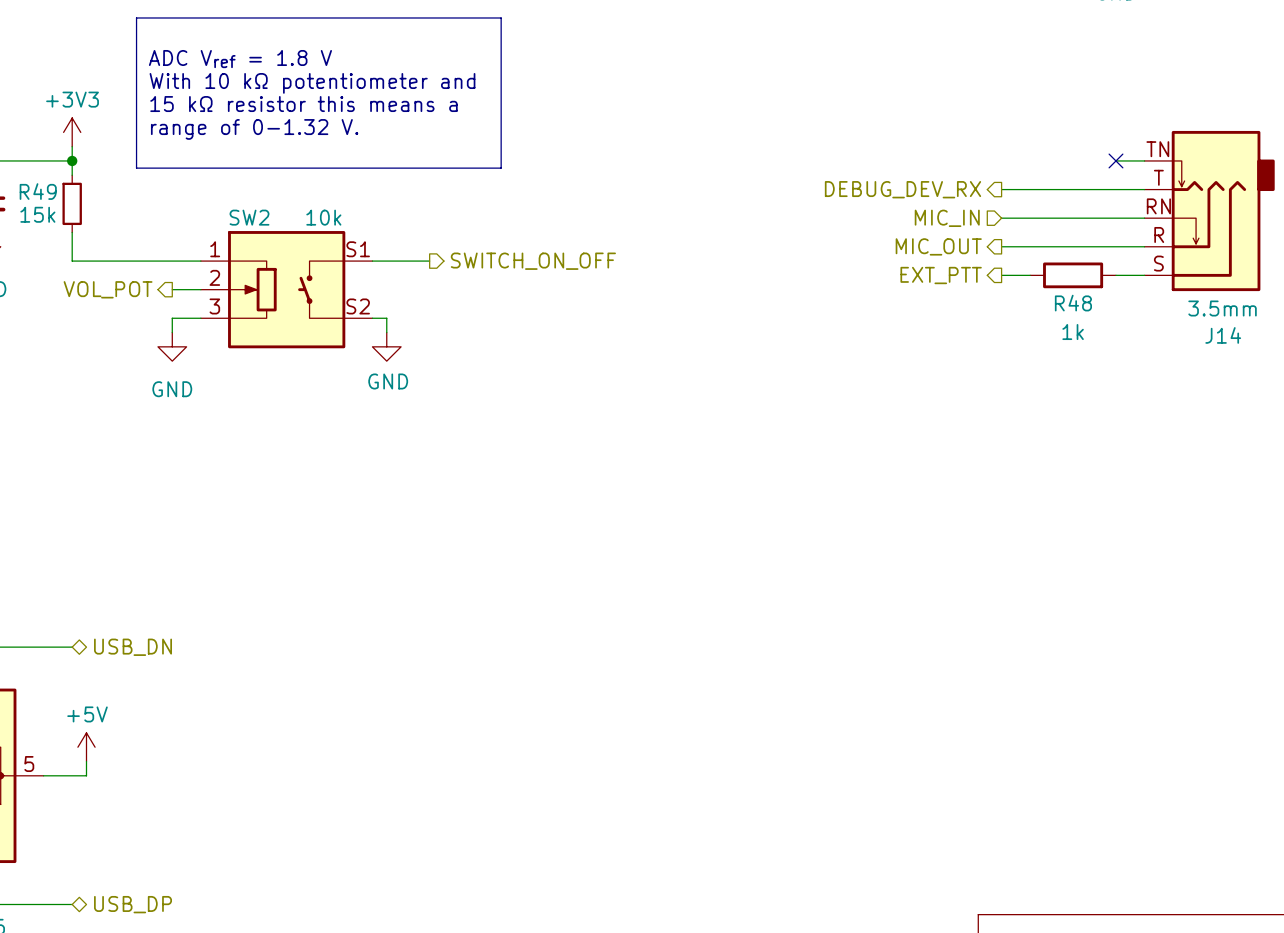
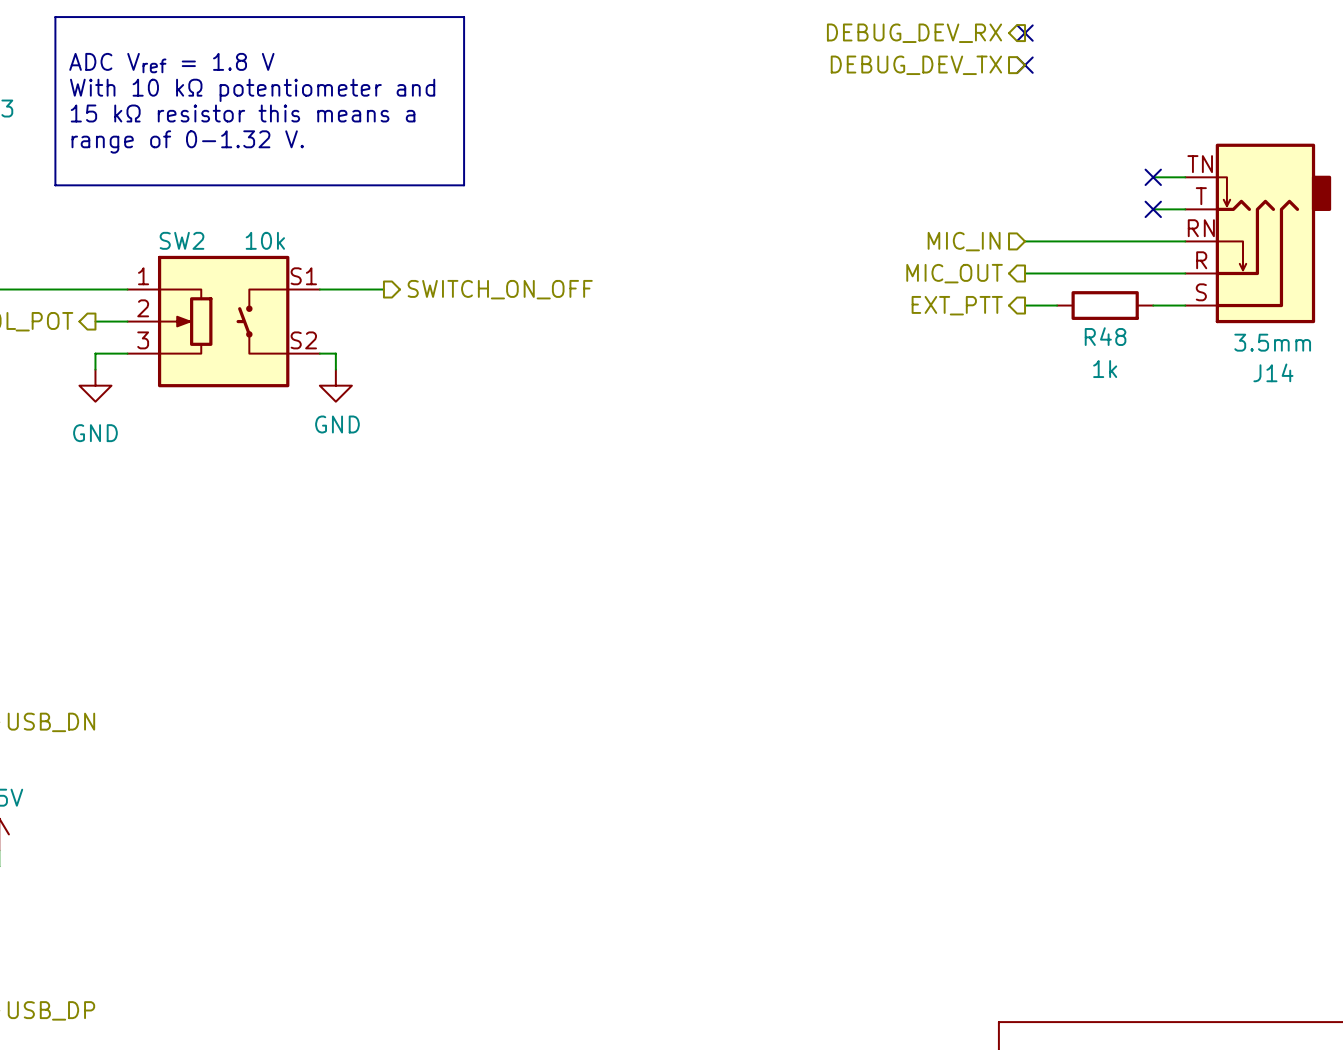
no-connect mark: none -> (1025, 33)
no-connect mark: none -> (1025, 65)
hierarchical label: none -> DEBUG_DEV_TX (916, 65)
hierarchical label position: DEBUG_DEV_RX (902, 189) -> DEBUG_DEV_RX (914, 33)
wire: (1001, 189) (1115, 189) -> none
no-connect mark: none -> (1153, 209)

